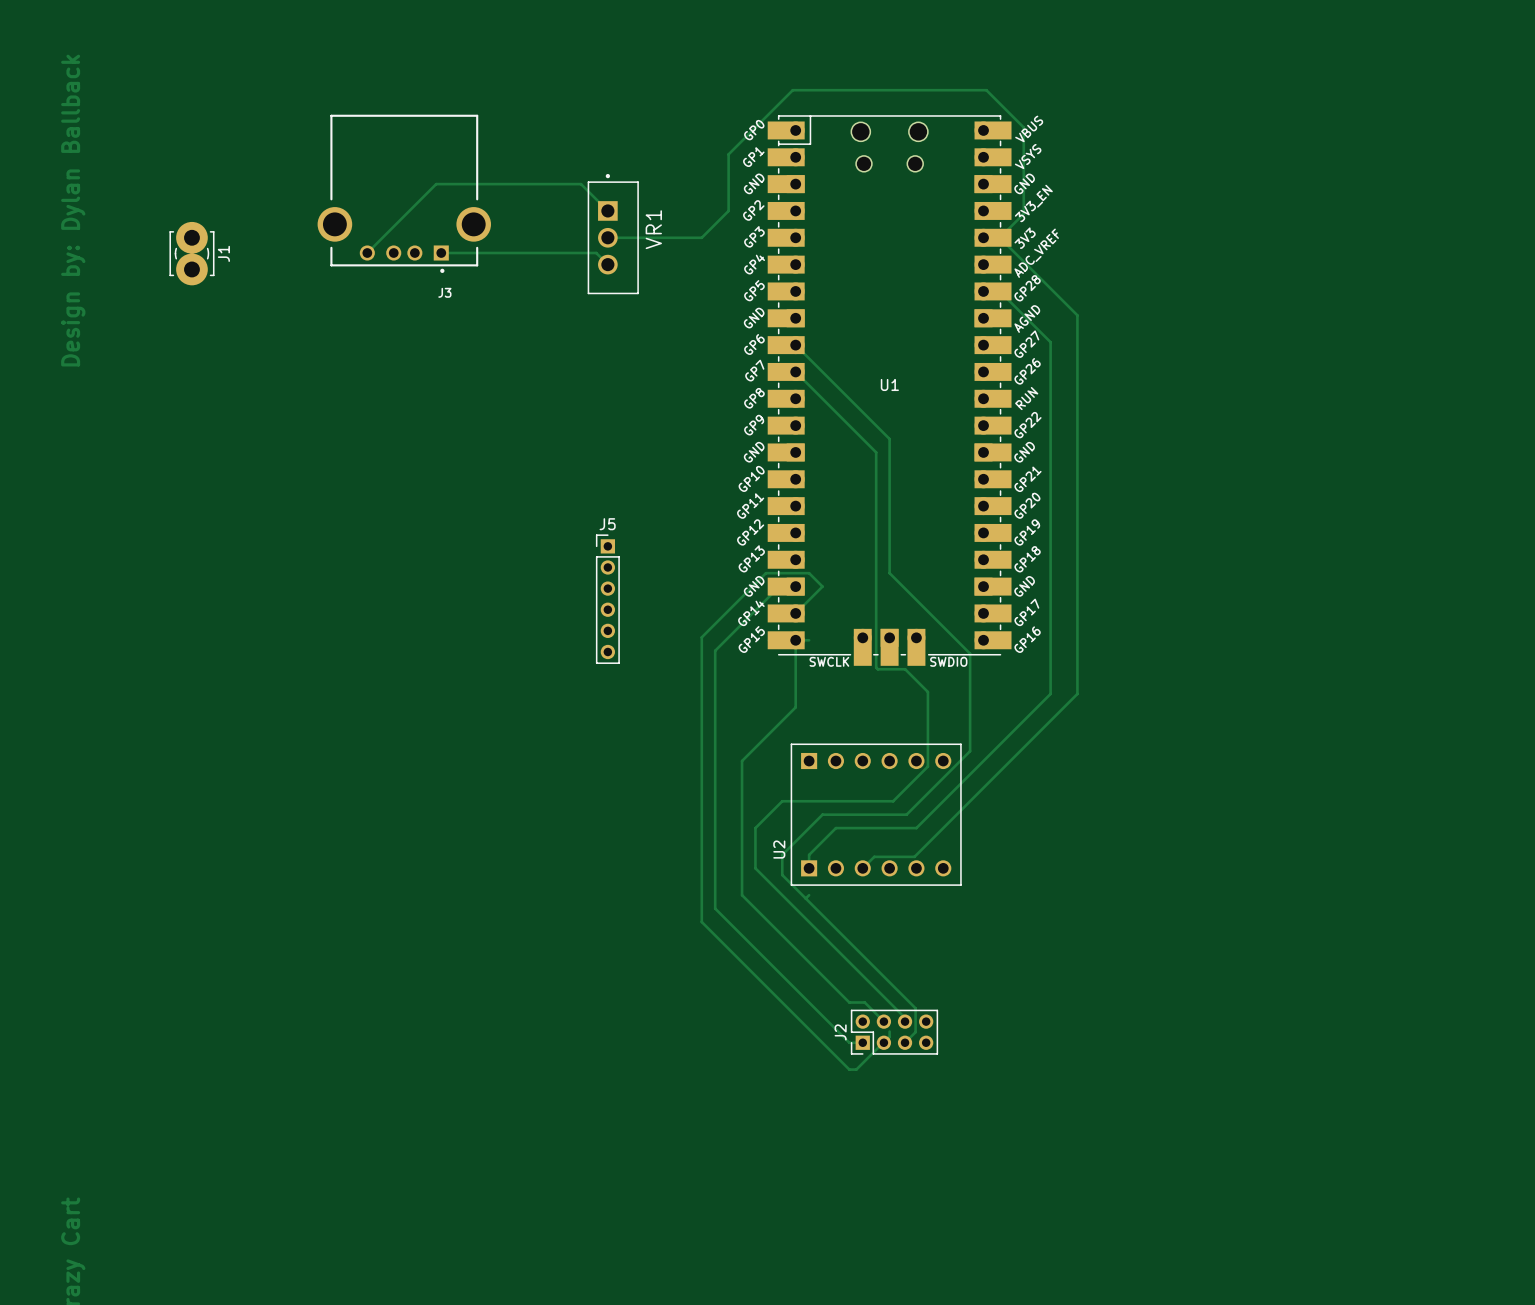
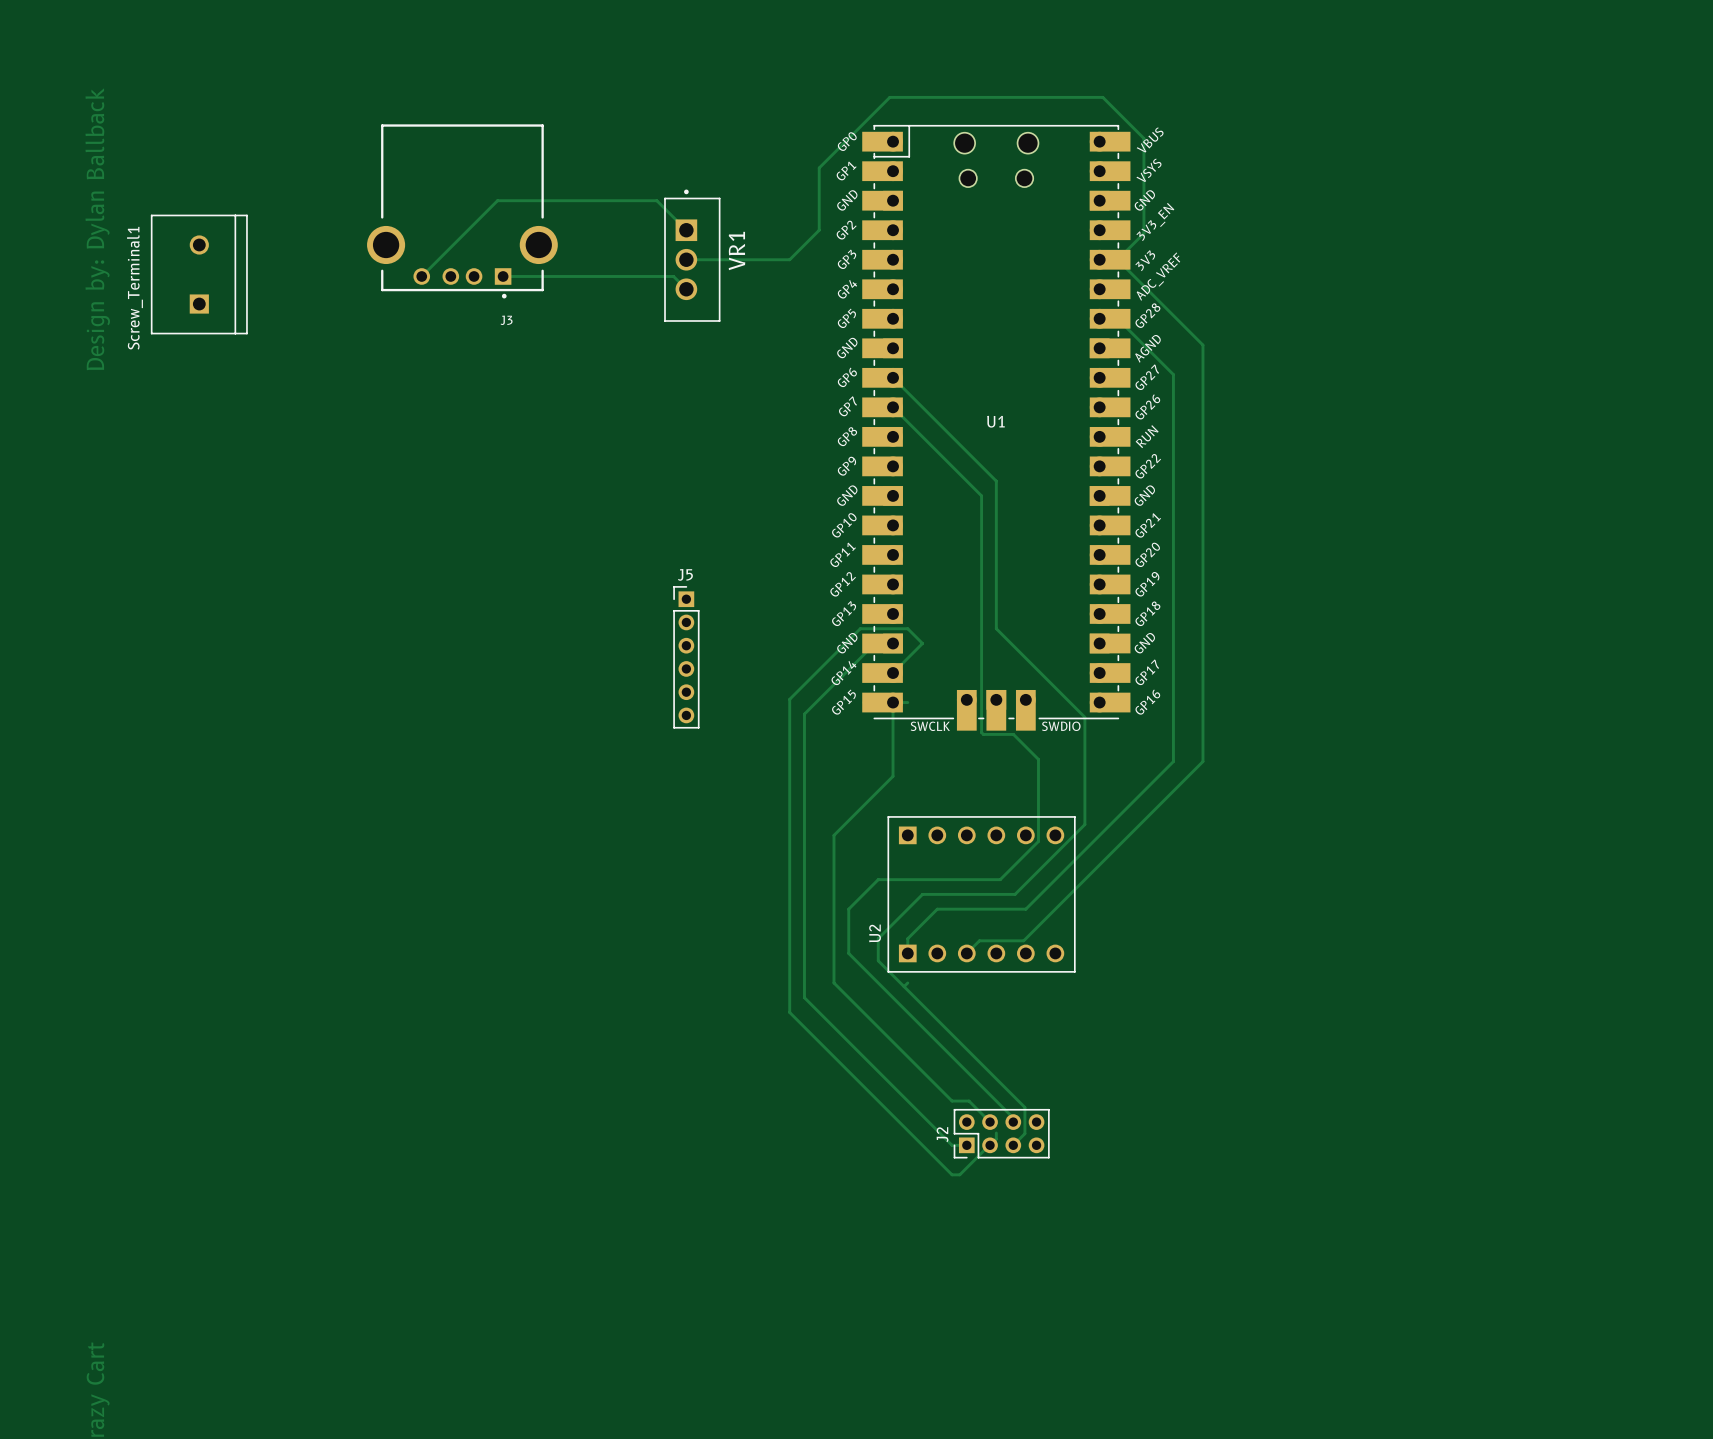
Screw_Terminal1: none -> (199, 274)
J1: (191, 253) -> none

